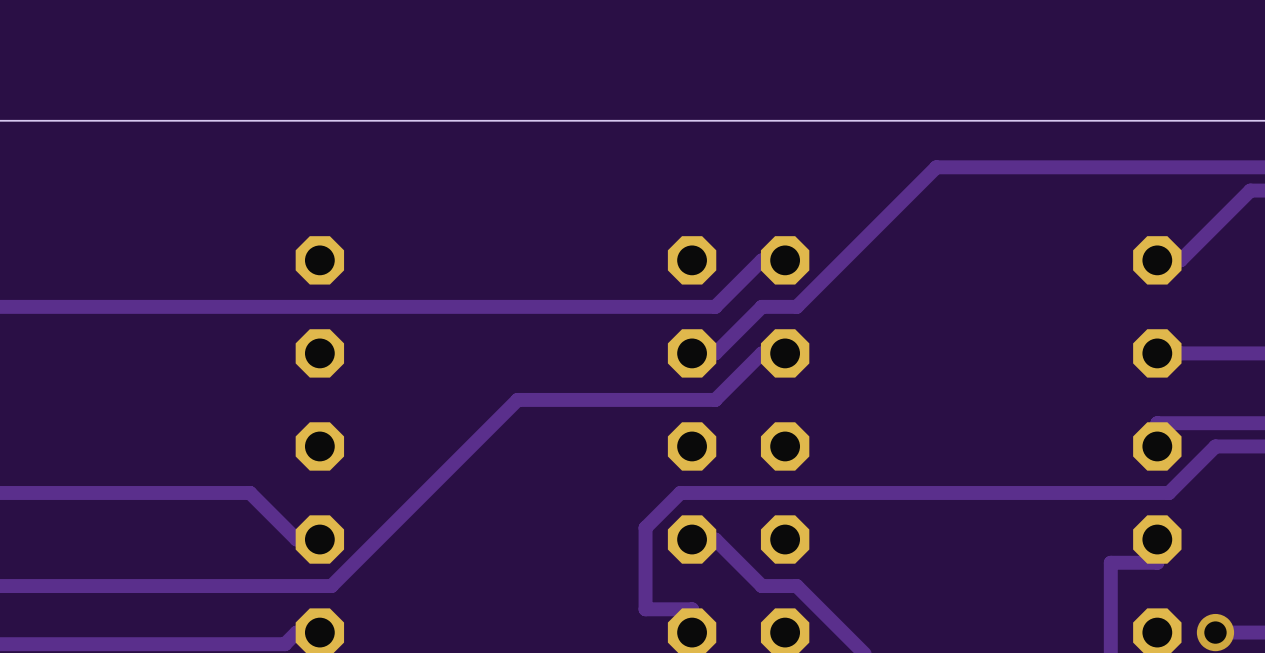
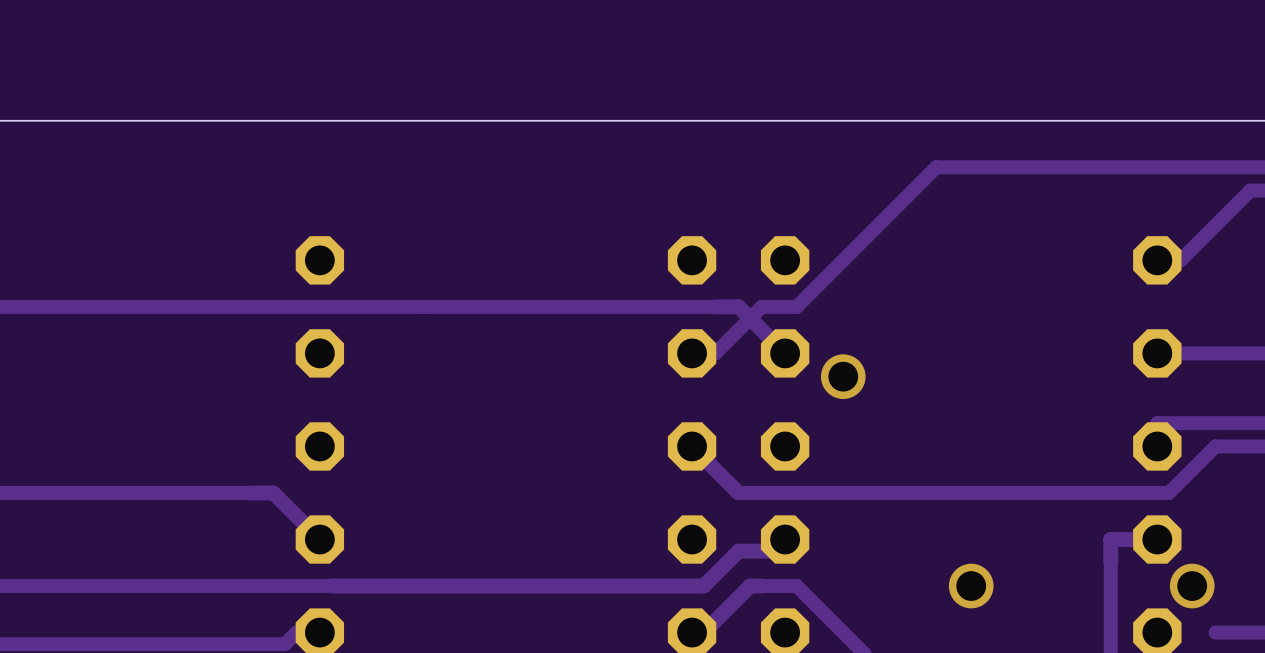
track: (785, 260) (761, 260) (715, 306) -> (785, 353) (738, 306) (715, 306)
track: (785, 353) (761, 353) (715, 399) (517, 399) (331, 586) -> (785, 539) (773, 551) (738, 551) (703, 586) (331, 586)
via: none -> (843, 376)
track: (250, 492) (296, 539) (319, 539) -> (250, 492) (273, 492) (319, 539)
track: (738, 492) (680, 492) (645, 527) (645, 609) (692, 609) (692, 632) -> (738, 492) (692, 446)
track: (692, 539) (715, 539) (761, 586) -> (692, 632) (703, 632) (750, 586) (761, 586)
track: (1157, 539) (1157, 562) (1110, 562) -> (1157, 539) (1110, 539) (1110, 562)
via: none -> (971, 586)
via: none -> (1192, 586)
via: (1215, 632) -> none

